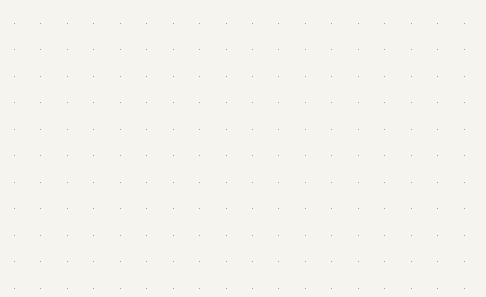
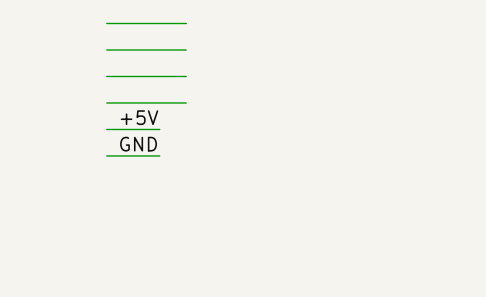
wire: none -> (106, 23) (186, 23)
wire: none -> (106, 49) (186, 49)
wire: none -> (106, 76) (186, 76)
wire: none -> (106, 102) (186, 102)
label: none -> +5V (139, 117)
wire: none -> (106, 129) (159, 129)
label: none -> GND (138, 144)
wire: none -> (106, 155) (159, 155)

